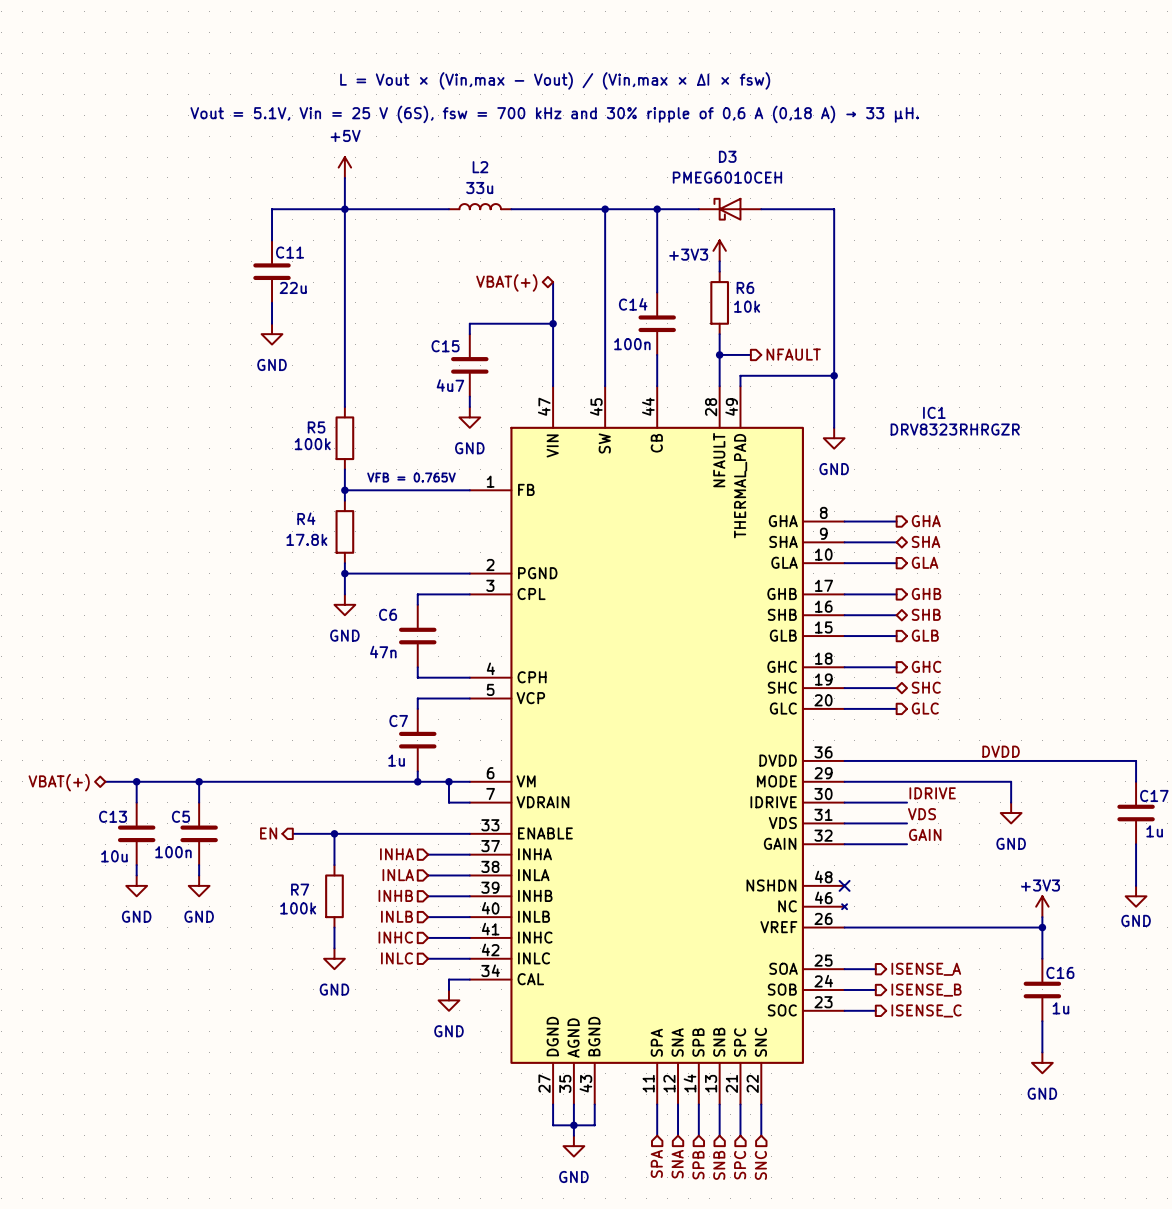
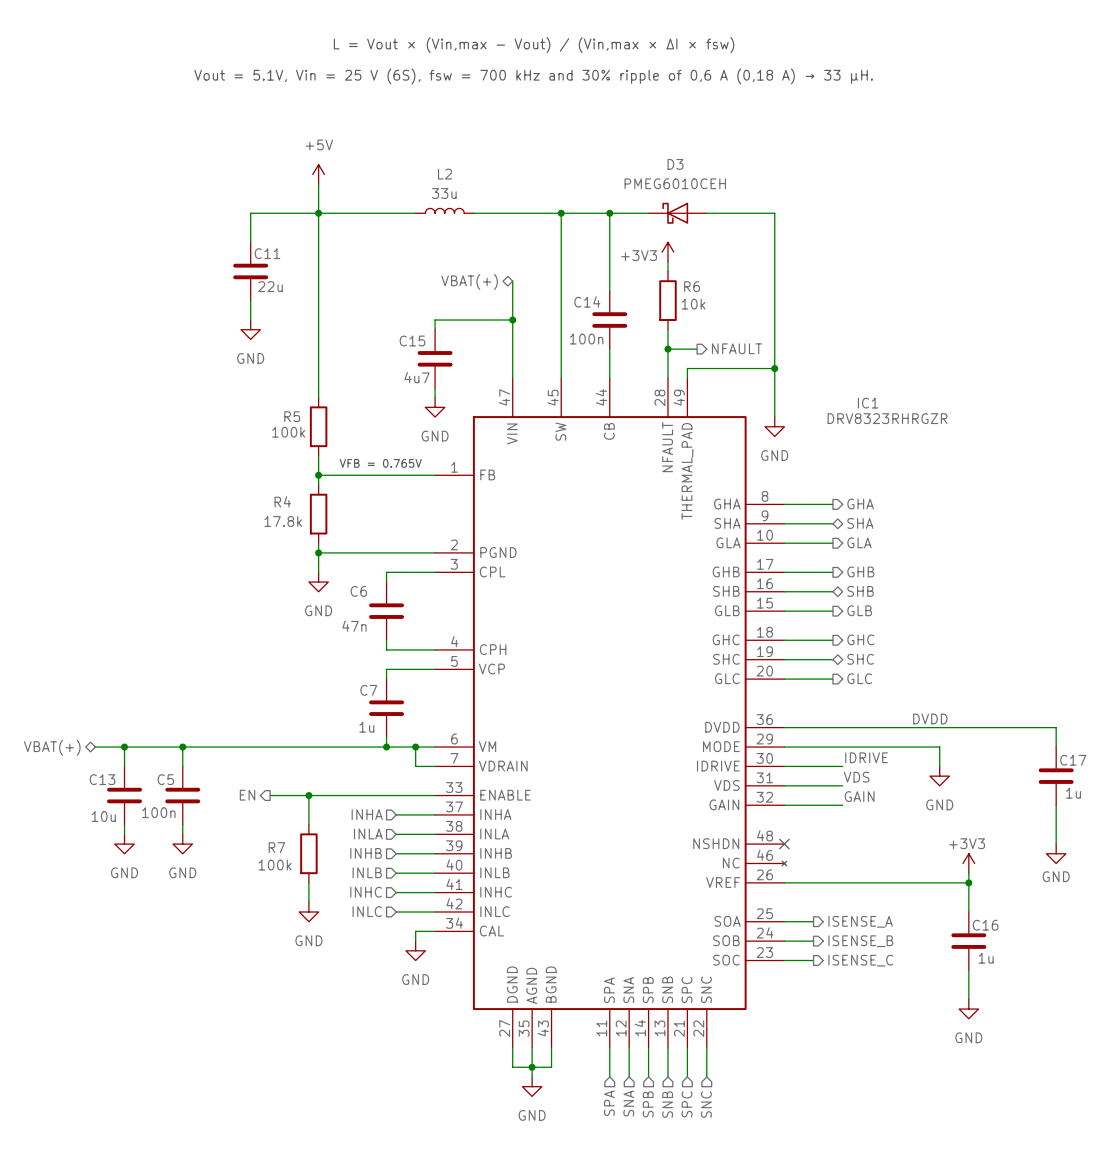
text position: L = Vout × (Vin,max − Vout) / (Vin,max × ΔI × fsw) (555, 80) -> L = Vout × (Vin,max − Vout) / (Vin,max × ΔI × fsw) (534, 45)
text position: Vout = 5.1V, Vin = 25 V (6S), fsw = 700 kHz and 30% ripple of 0,6 A (0,18 A) → 33 µH. (554, 114) -> Vout = 5.1V, Vin = 25 V (6S), fsw = 700 kHz and 30% ripple of 0,6 A (0,18 A) → 33 µH. (533, 76)

